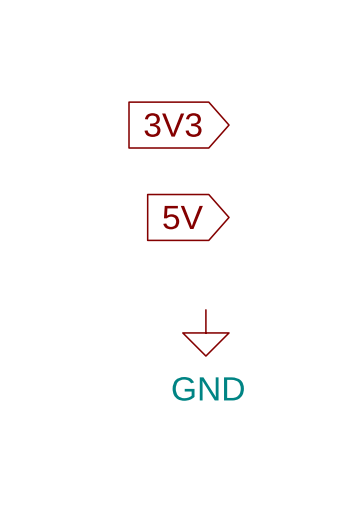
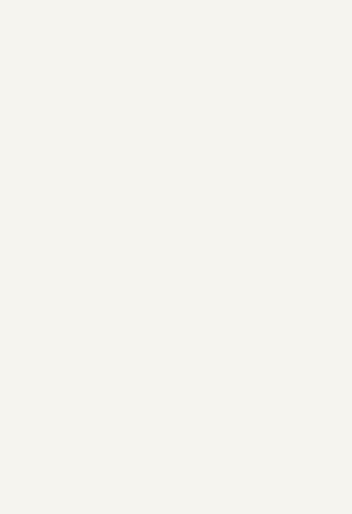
global label: 3V3 (173, 125) -> none
global label: 5V (183, 217) -> none
power symbol: GND (205, 332) -> none

